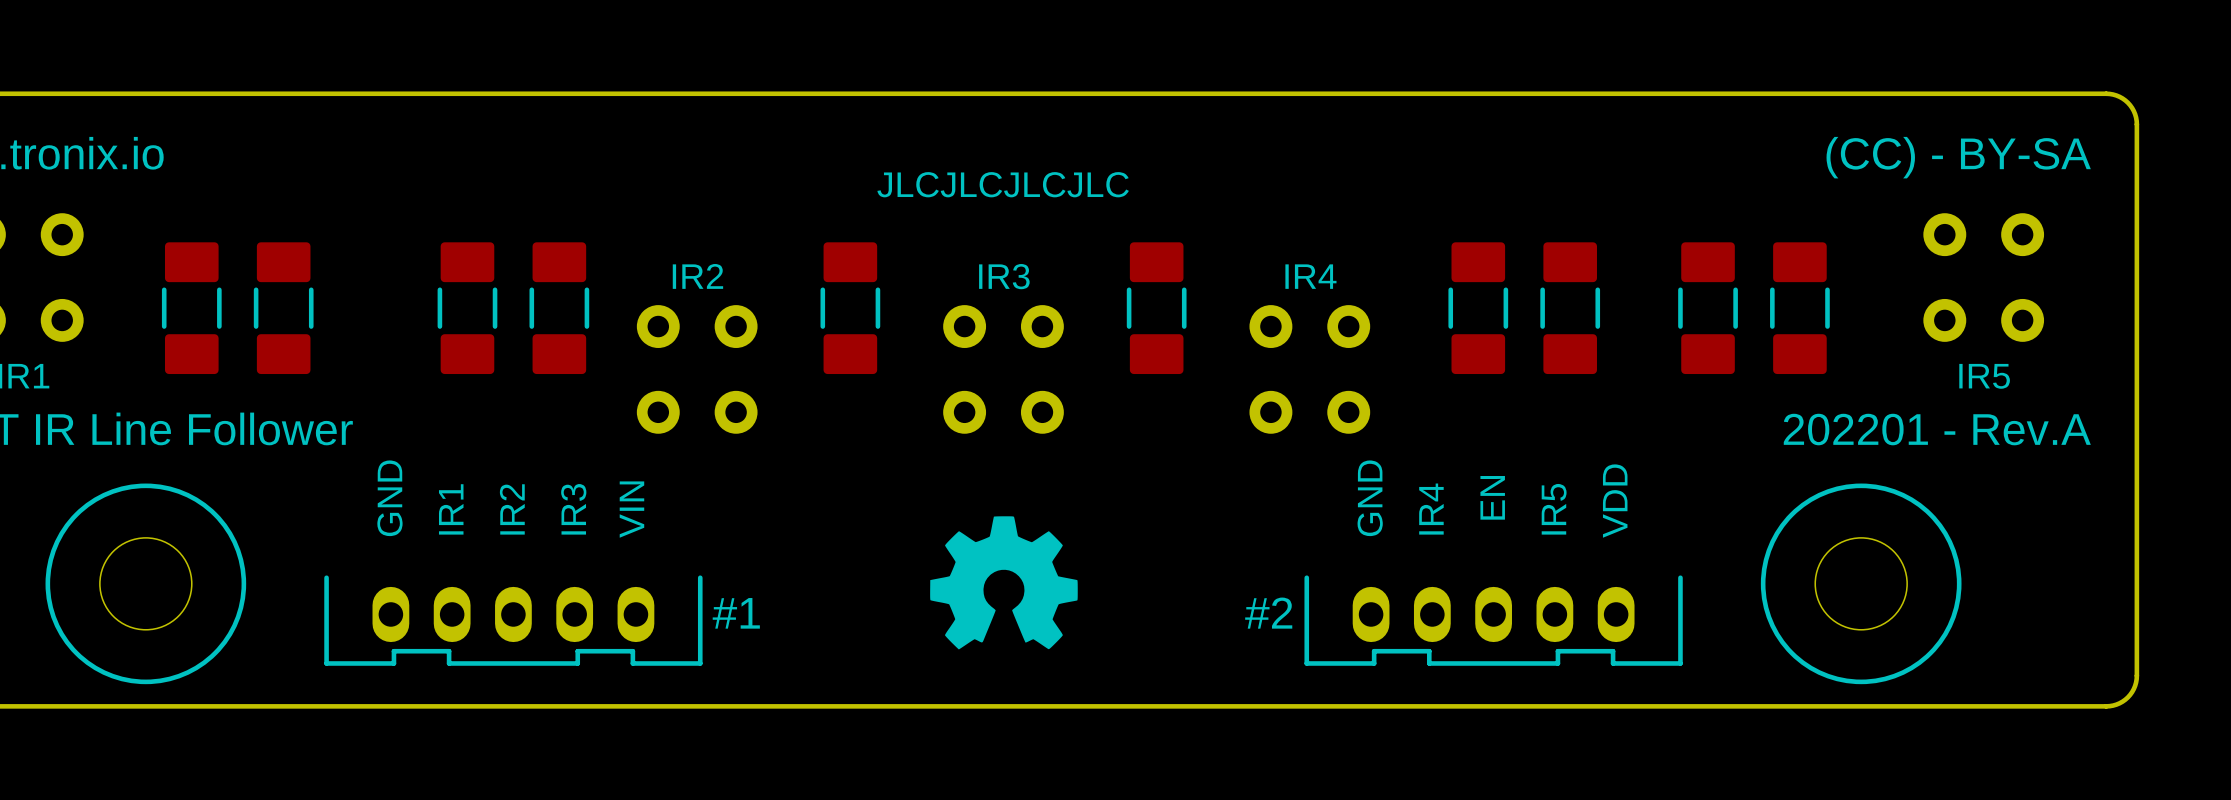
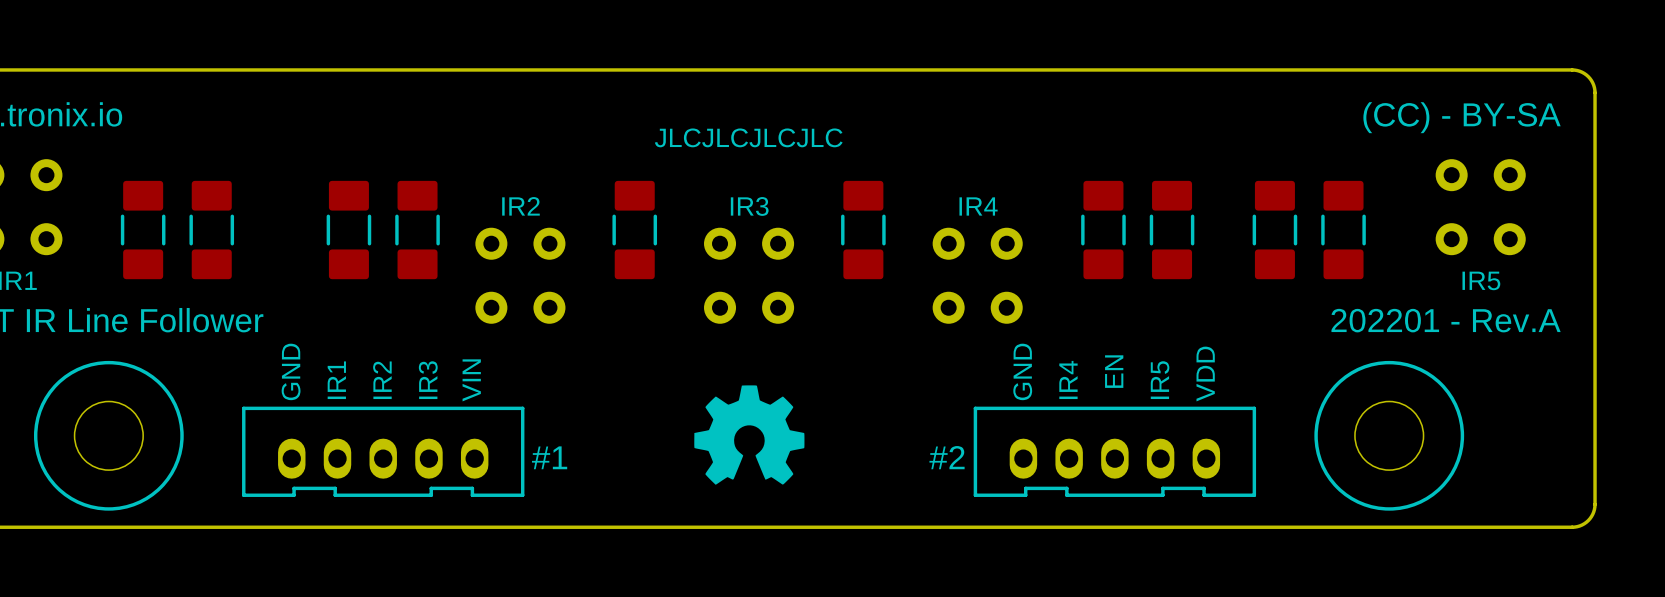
part footprint: [324, 575, 703, 666] -> [242, 406, 525, 497]
part footprint: [1304, 575, 1683, 666] -> [973, 406, 1257, 497]

